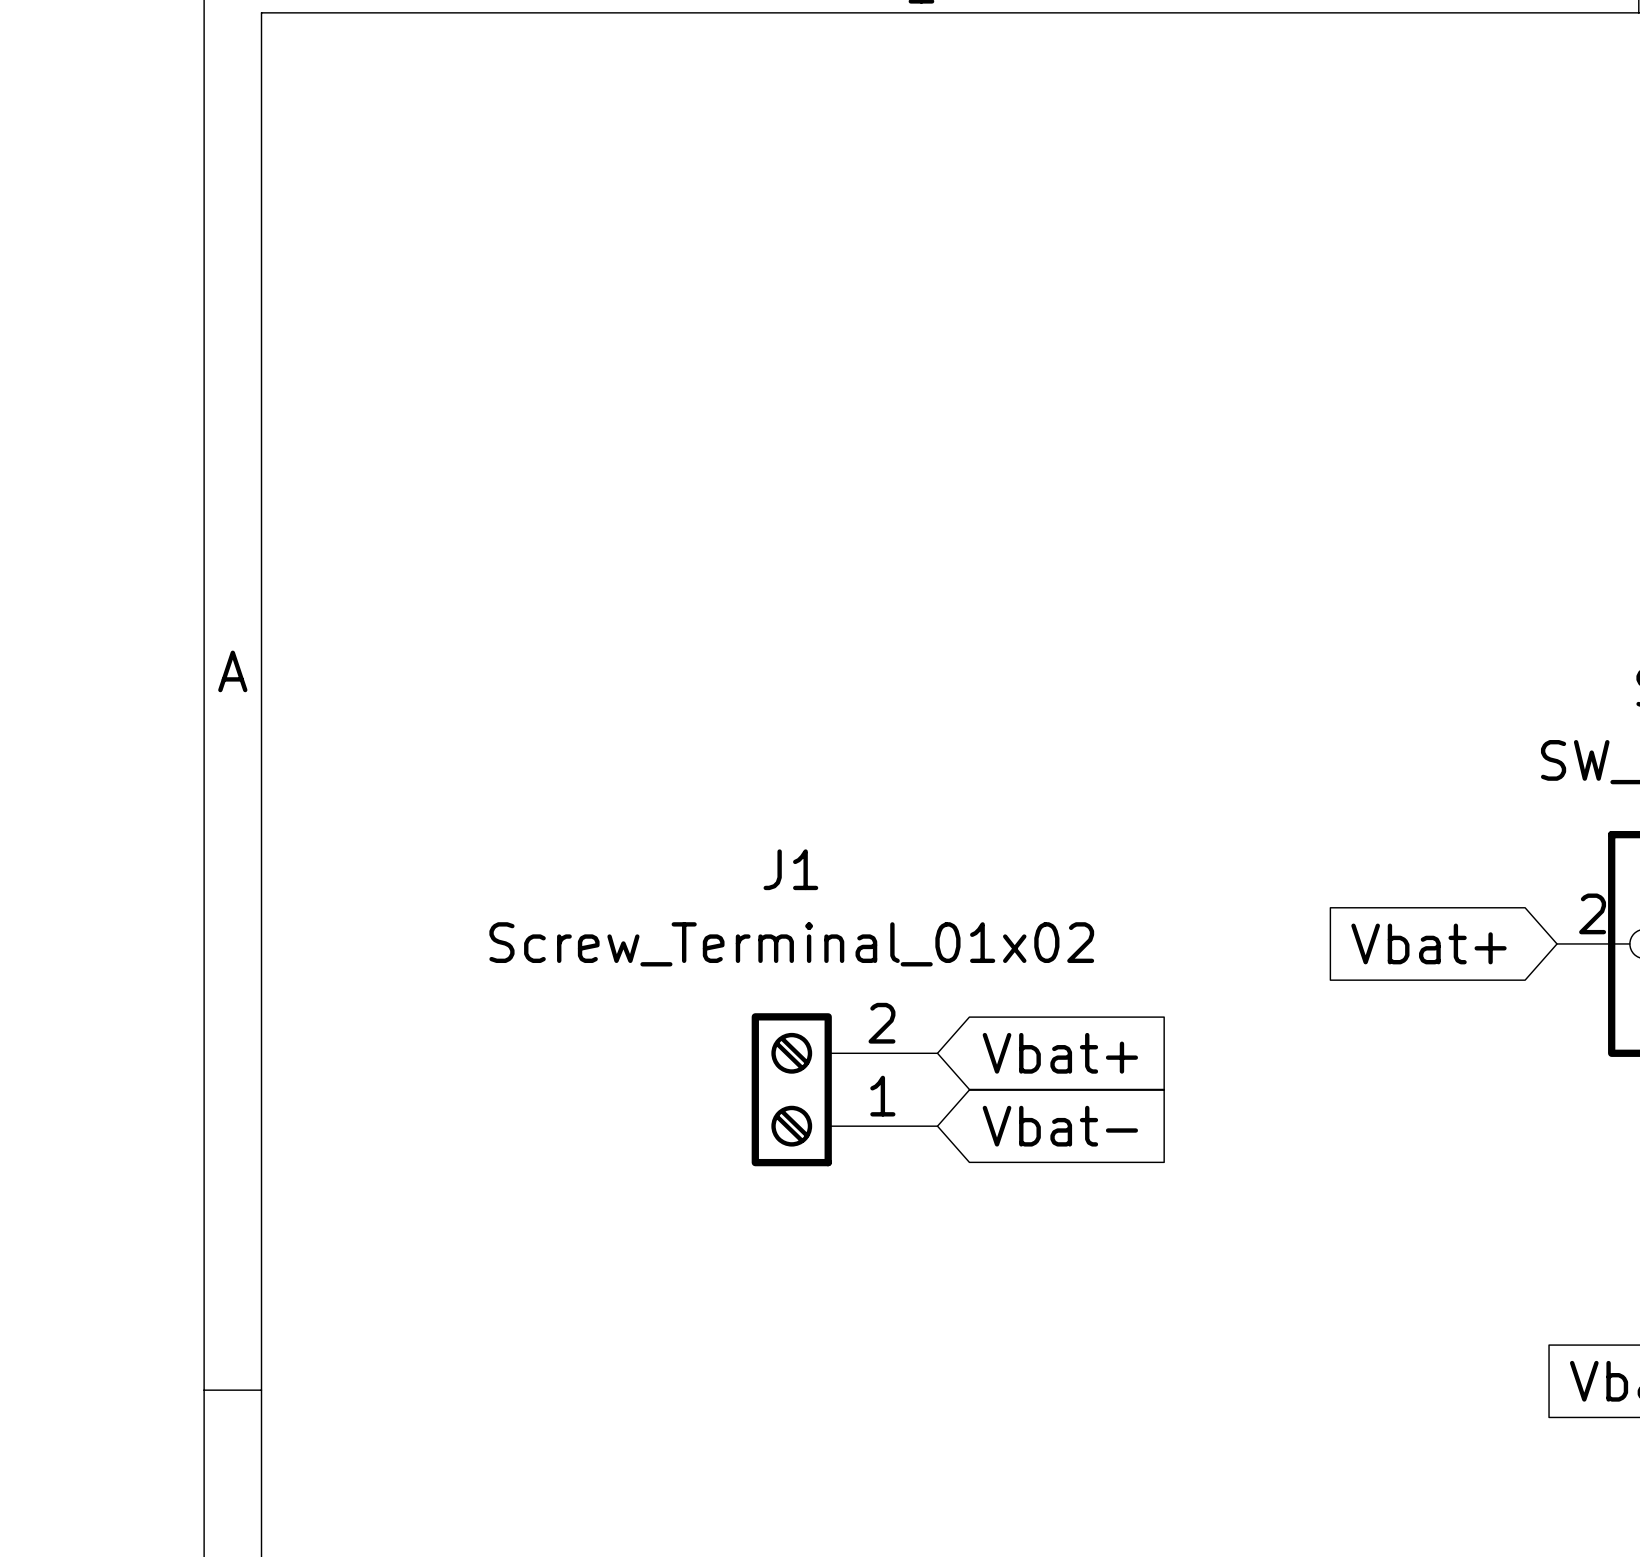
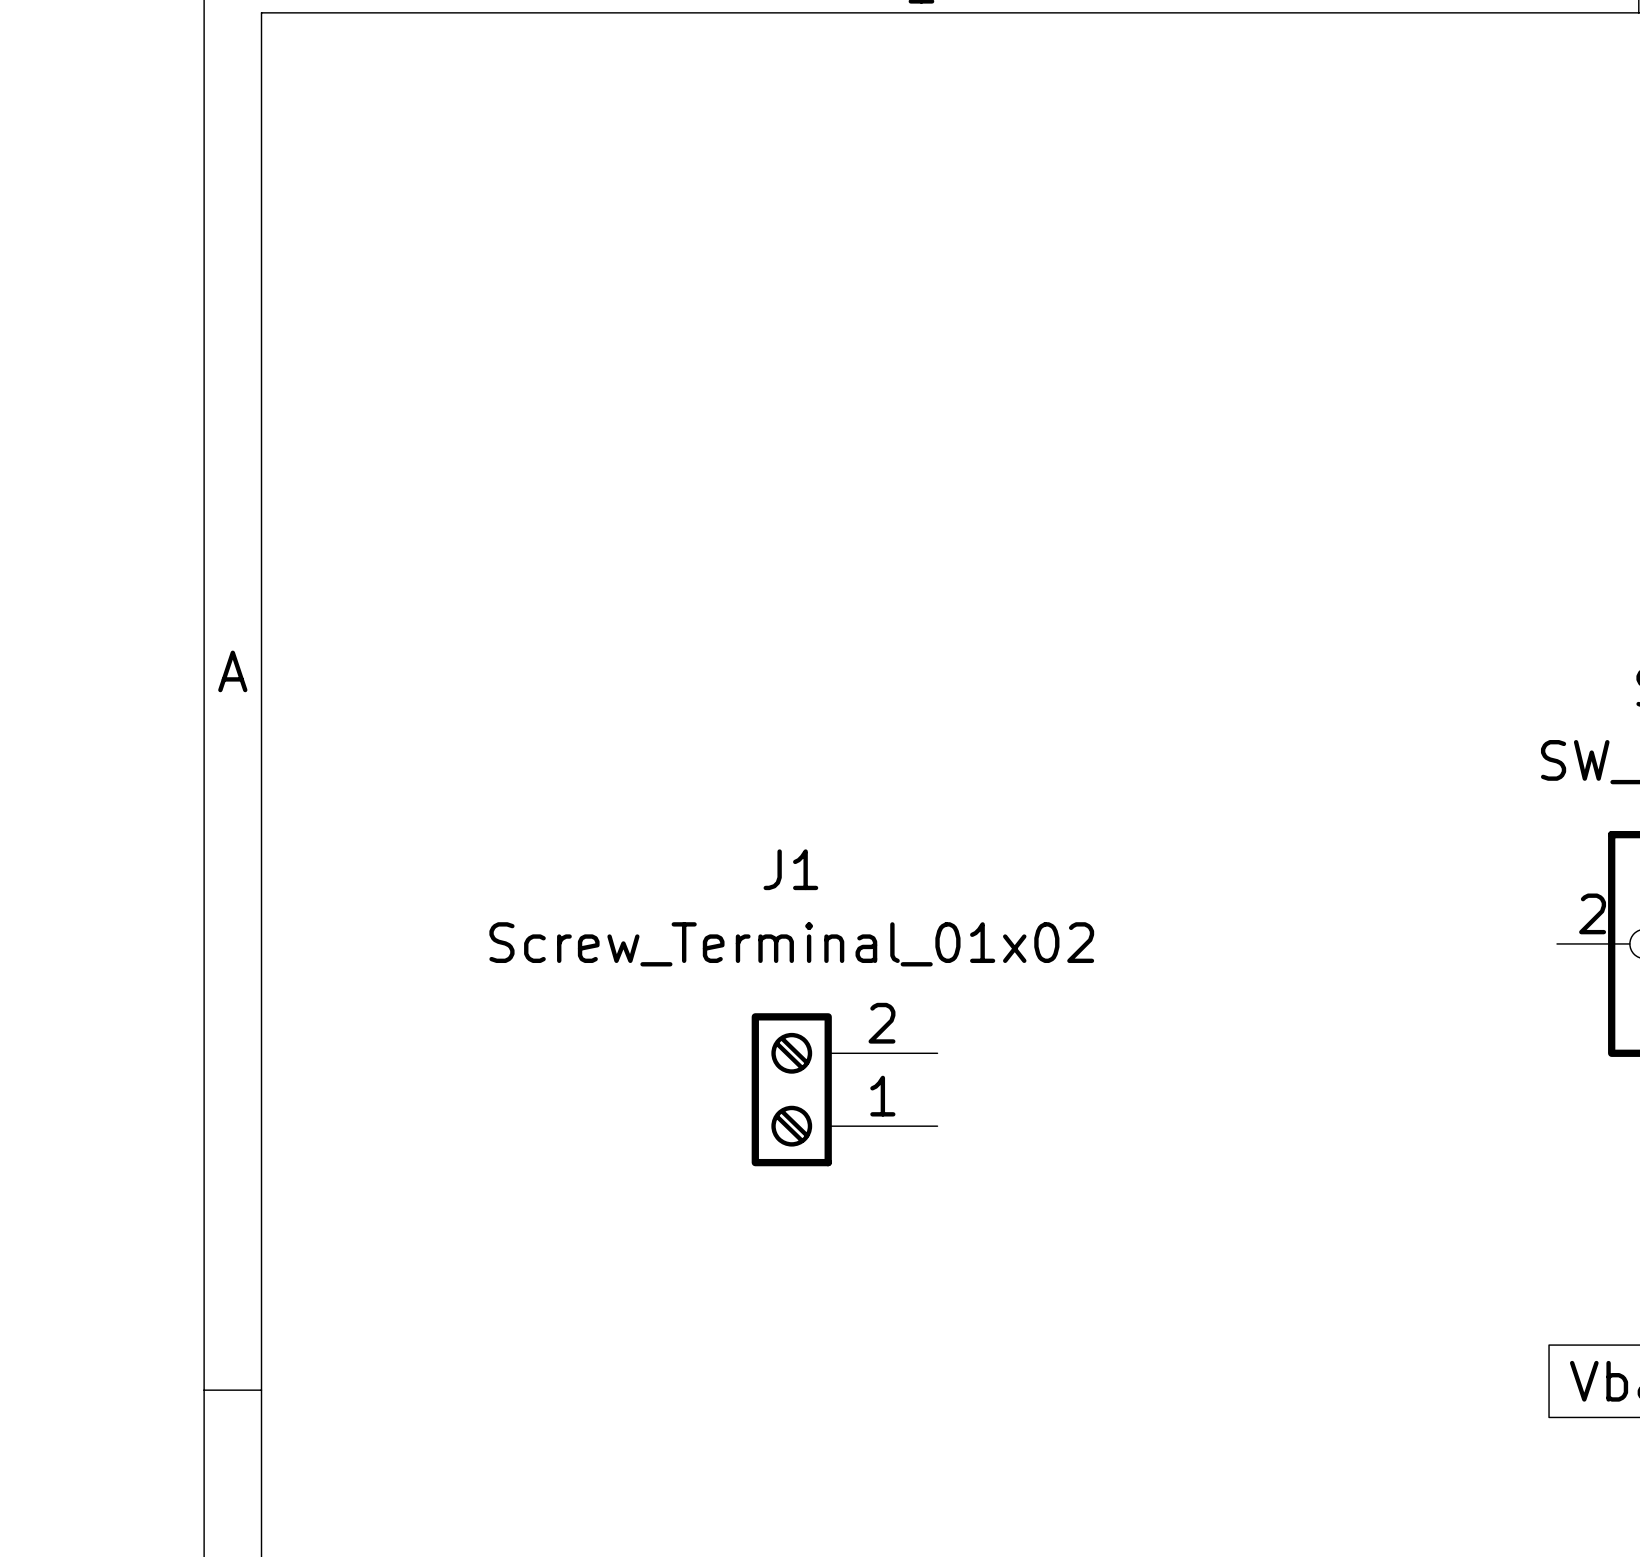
global label: Vbat+ (1428, 943) -> none
global label: Vbat+ (1060, 1053) -> none
global label: Vbat- (1060, 1126) -> none

